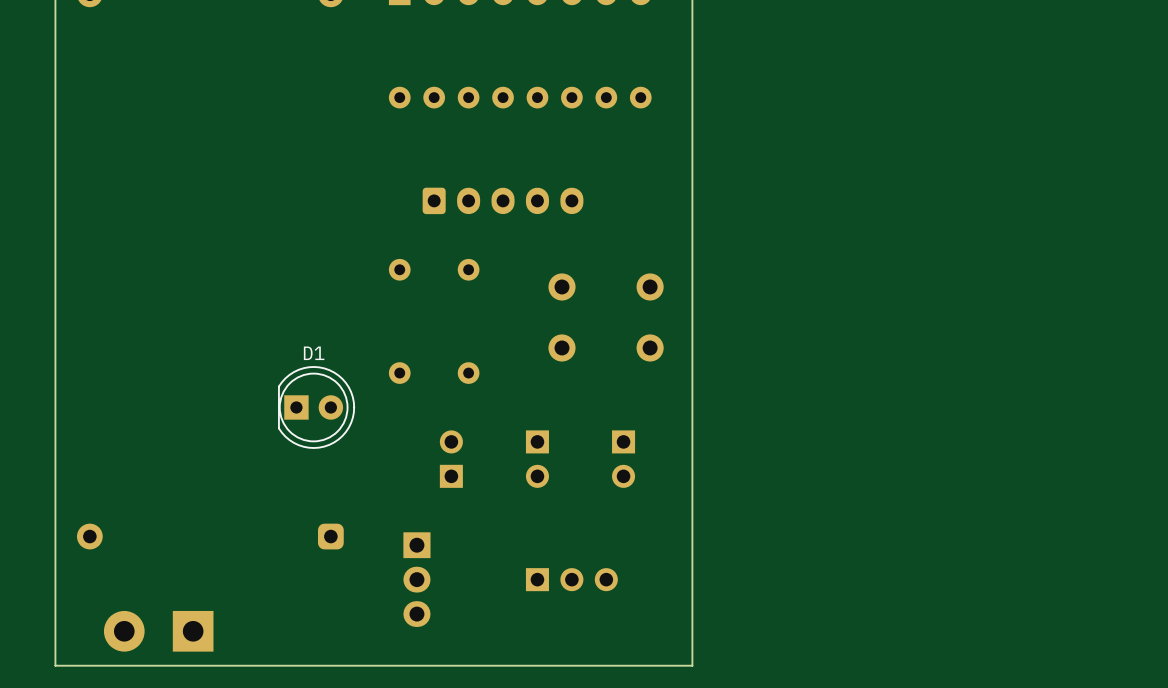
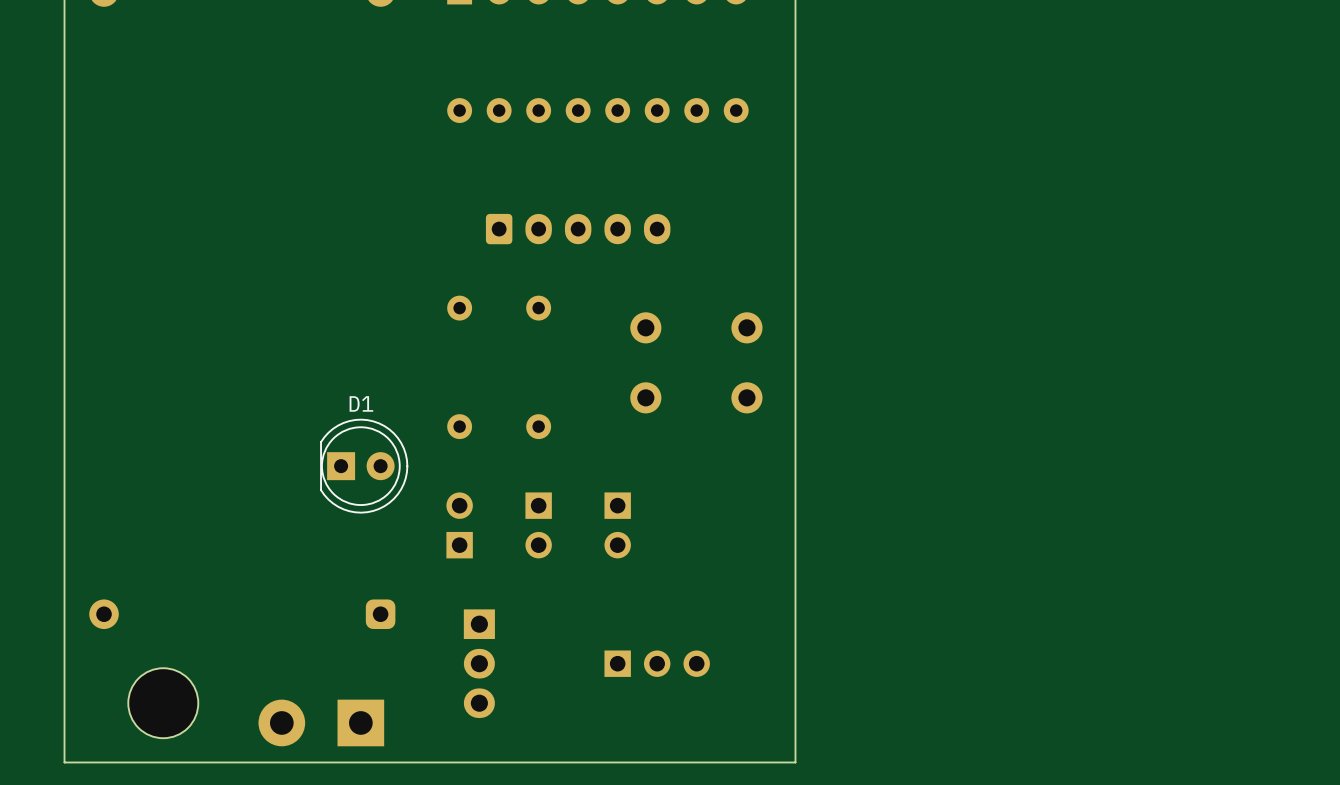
part: none -> (459, 525)
part rotation: 0° (451, 459) -> 180° (538, 525)
part: (623, 459) -> none
part: none -> (163, 703)
part position: (158, 631) -> (321, 722)

